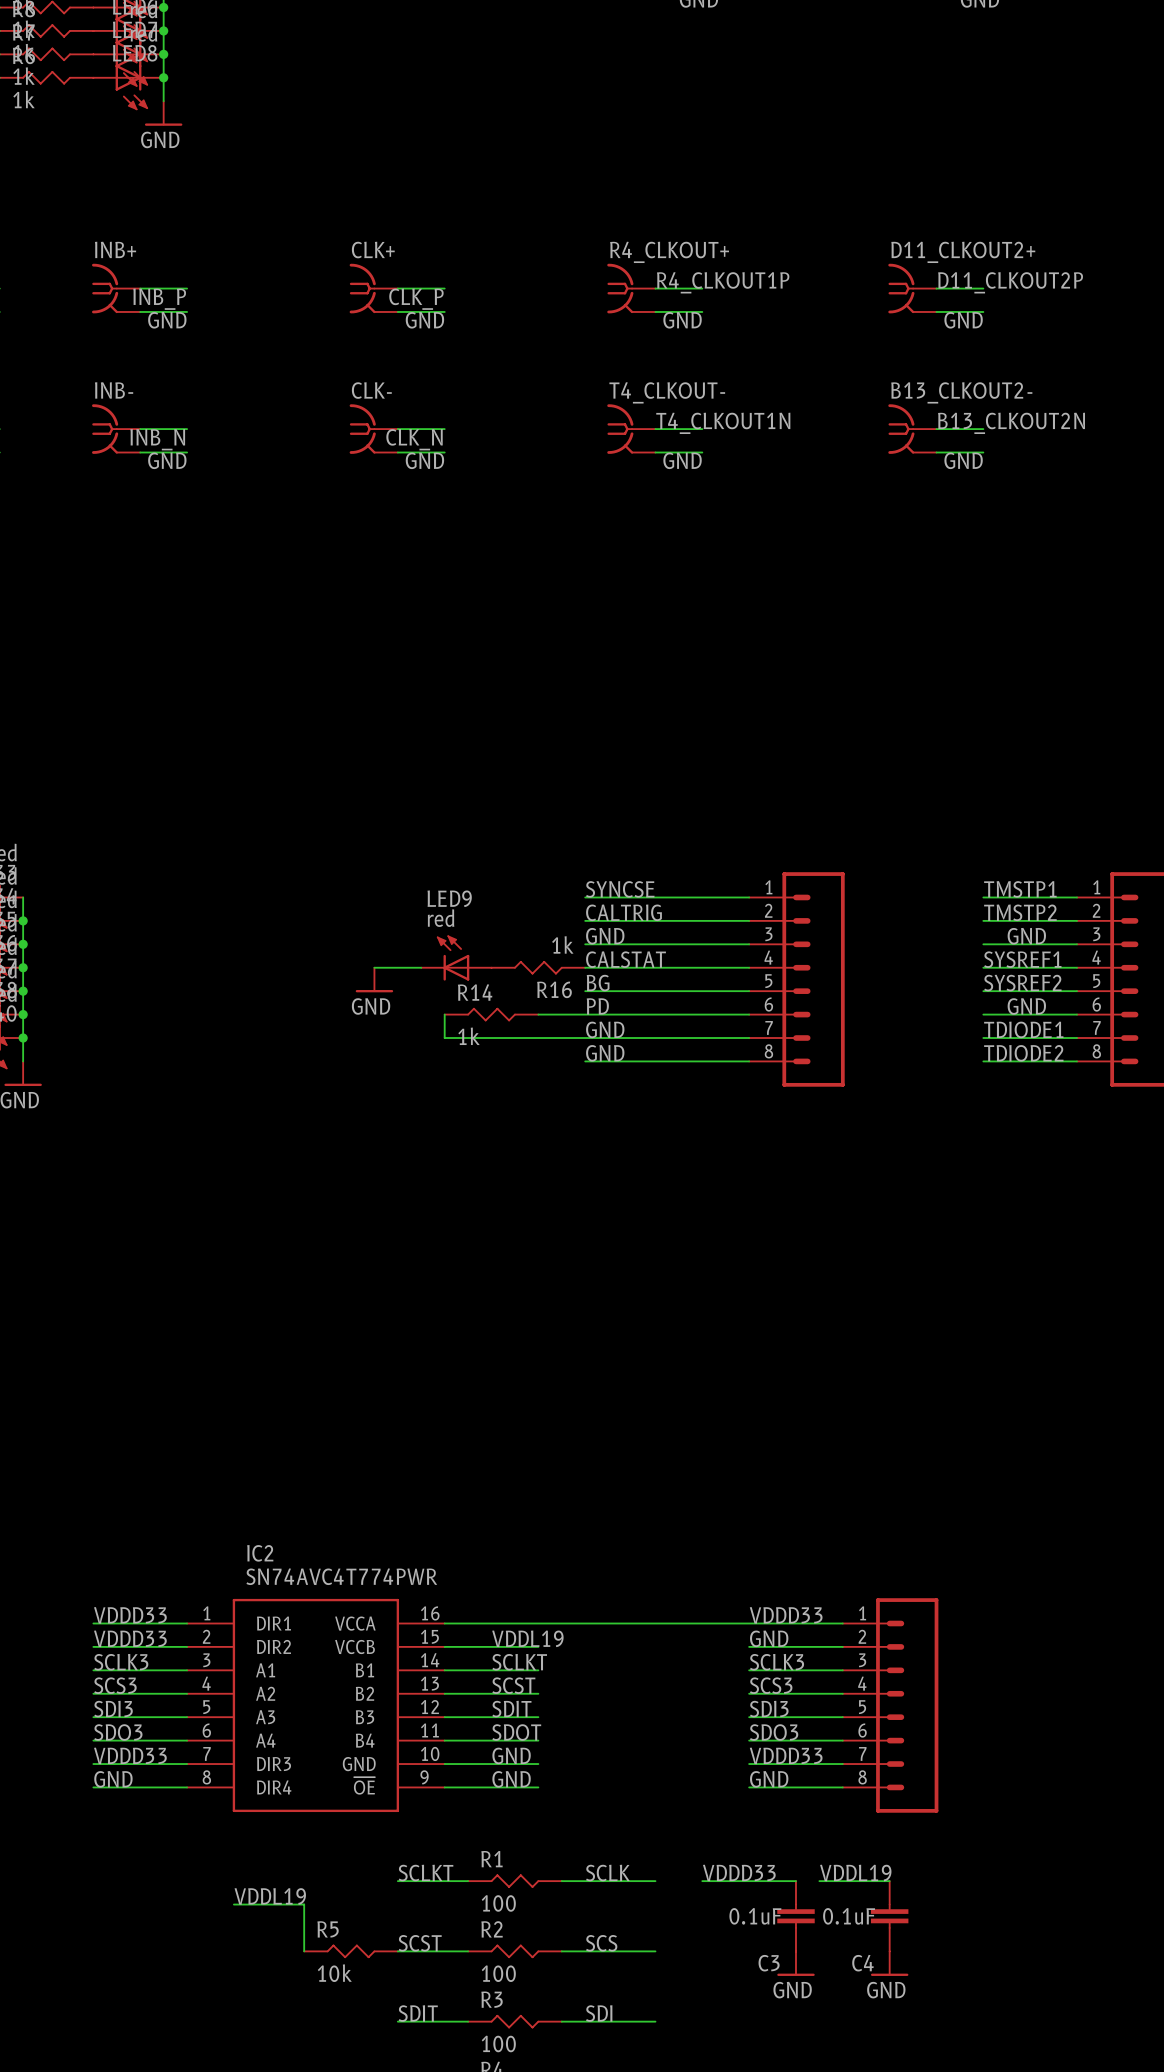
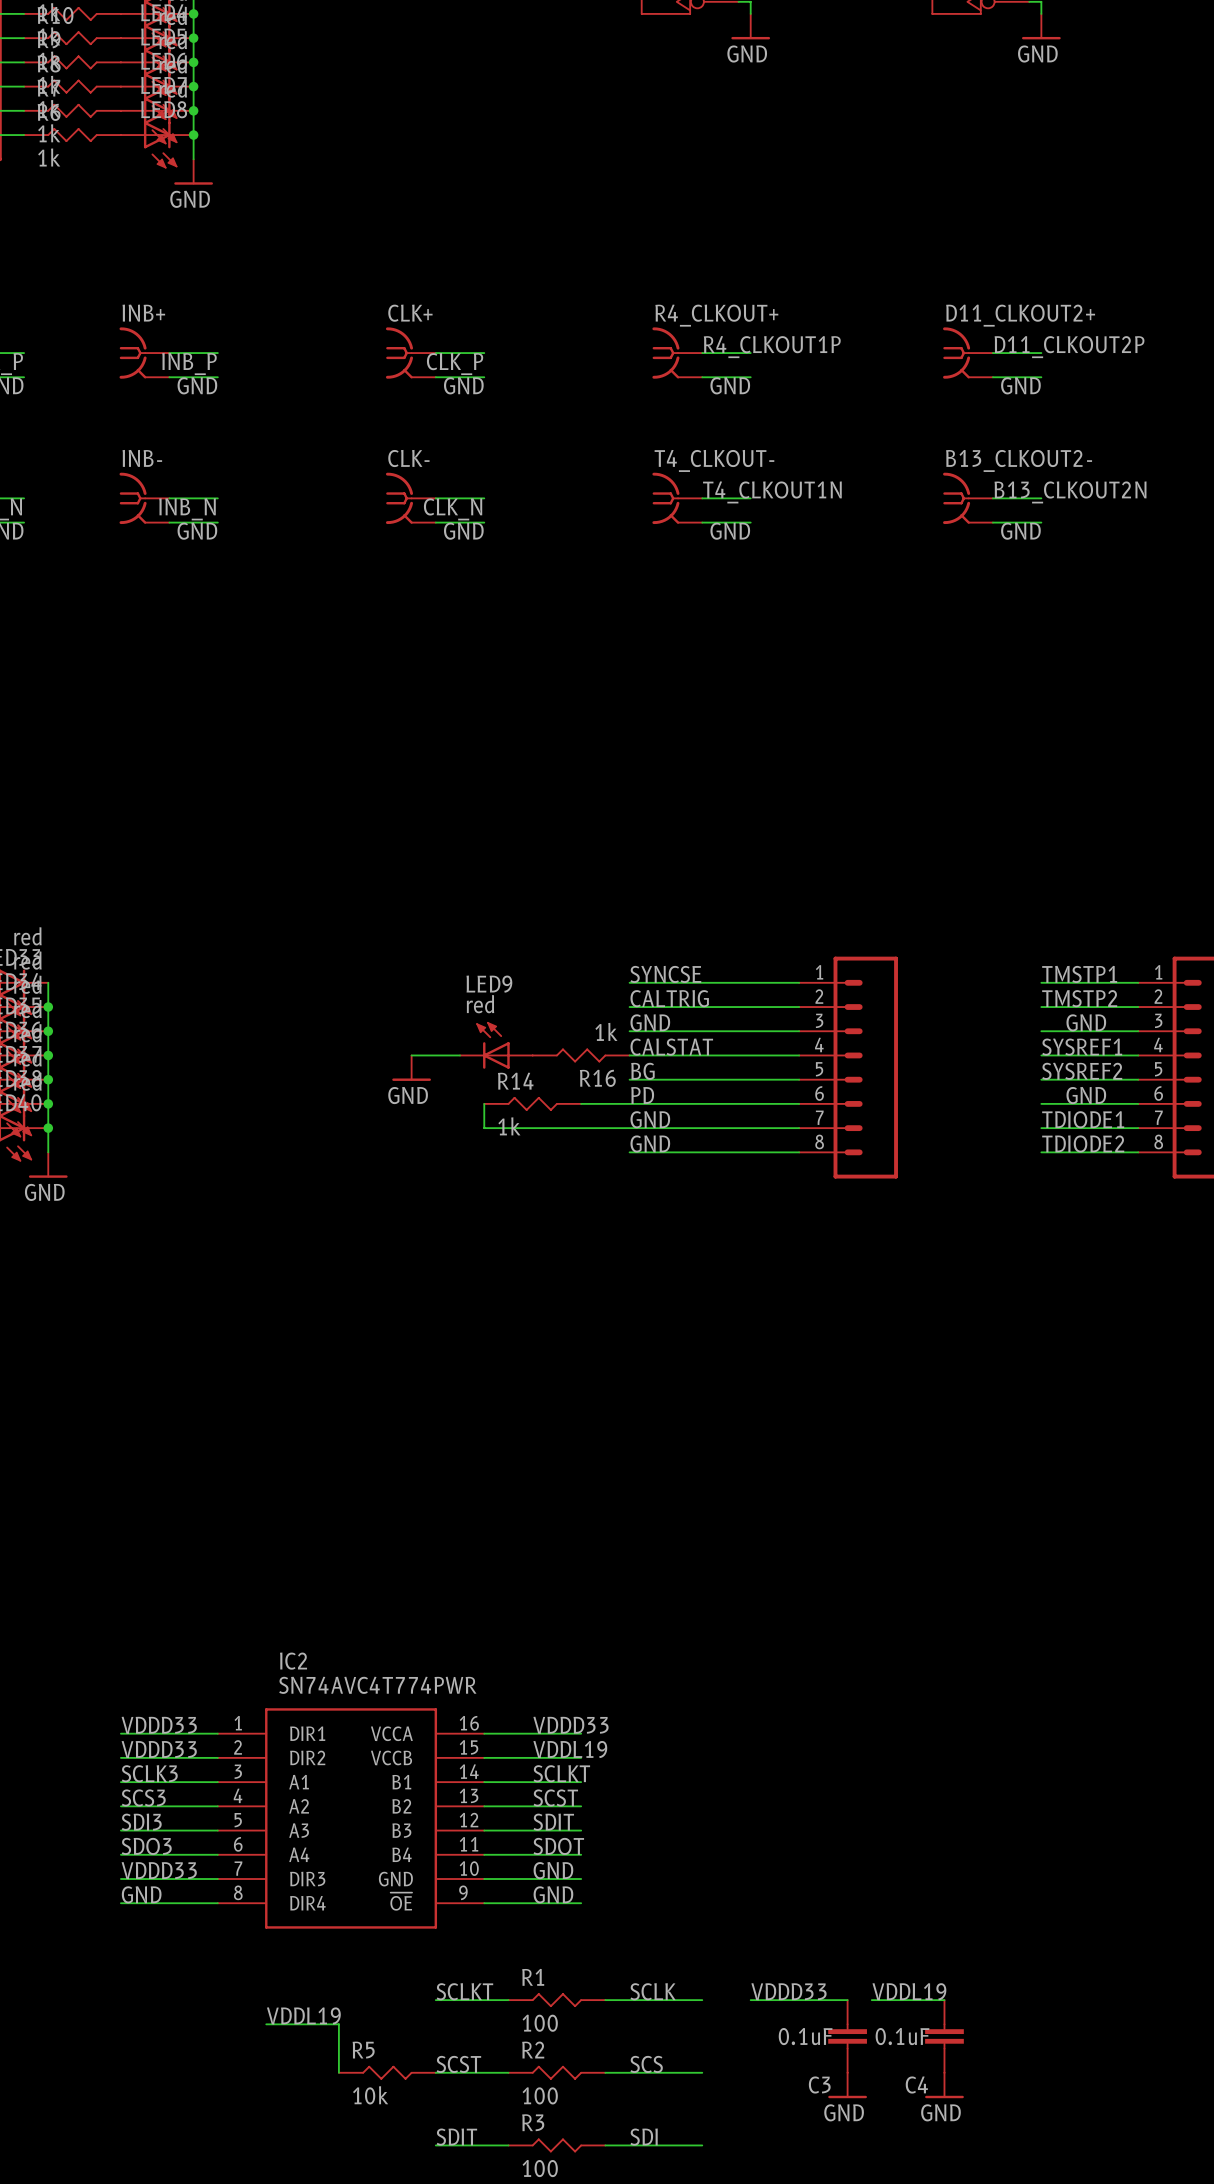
label: none -> VDDD33 (570, 1725)
label: VDDD33 (786, 1615) -> none
wire: (538, 1623) (842, 1623) -> none
label: GND (769, 1638) -> none
wire: (749, 1646) (842, 1646) -> none
label: SCLK3 (777, 1662) -> none
wire: (749, 1670) (842, 1670) -> none
label: SCS3 (771, 1685) -> none
wire: (749, 1693) (842, 1693) -> none
part: (890, 1705) -> none
label: SDI3 (769, 1709) -> none
wire: (749, 1717) (842, 1717) -> none
label: SDO3 (774, 1732) -> none
wire: (749, 1740) (842, 1740) -> none
label: VDDD33 (786, 1755) -> none
wire: (749, 1764) (842, 1764) -> none
label: GND (769, 1779) -> none
wire: (749, 1787) (842, 1787) -> none

